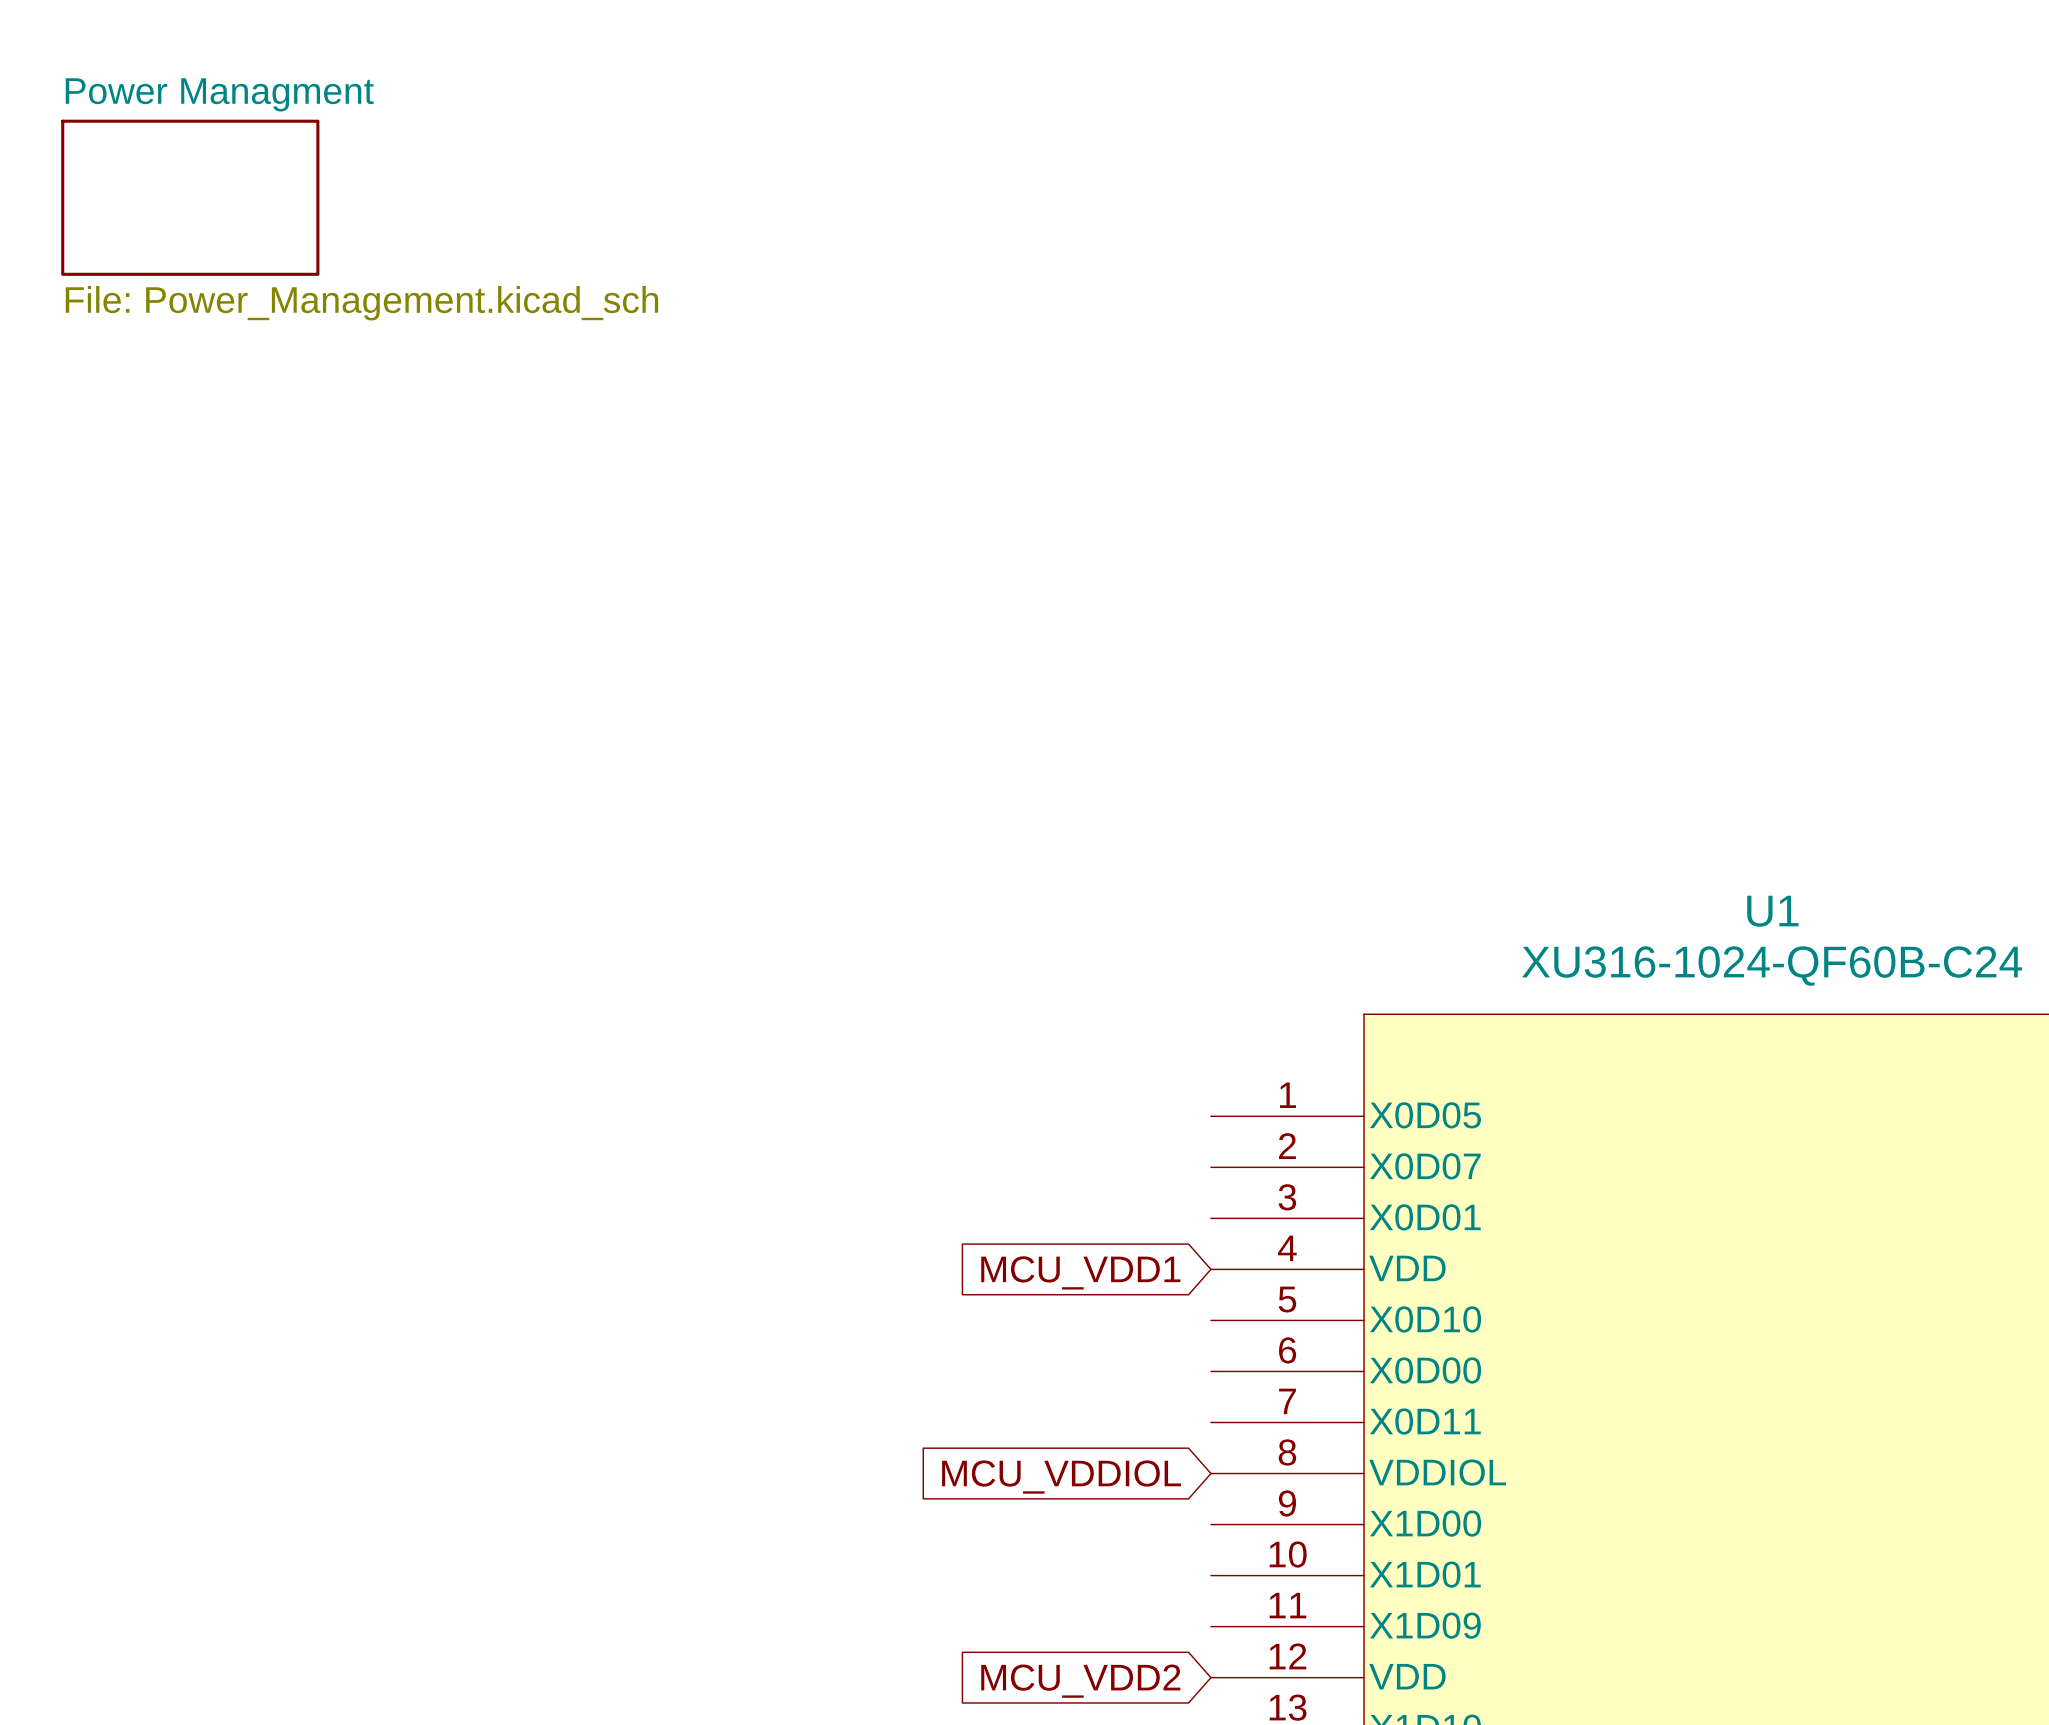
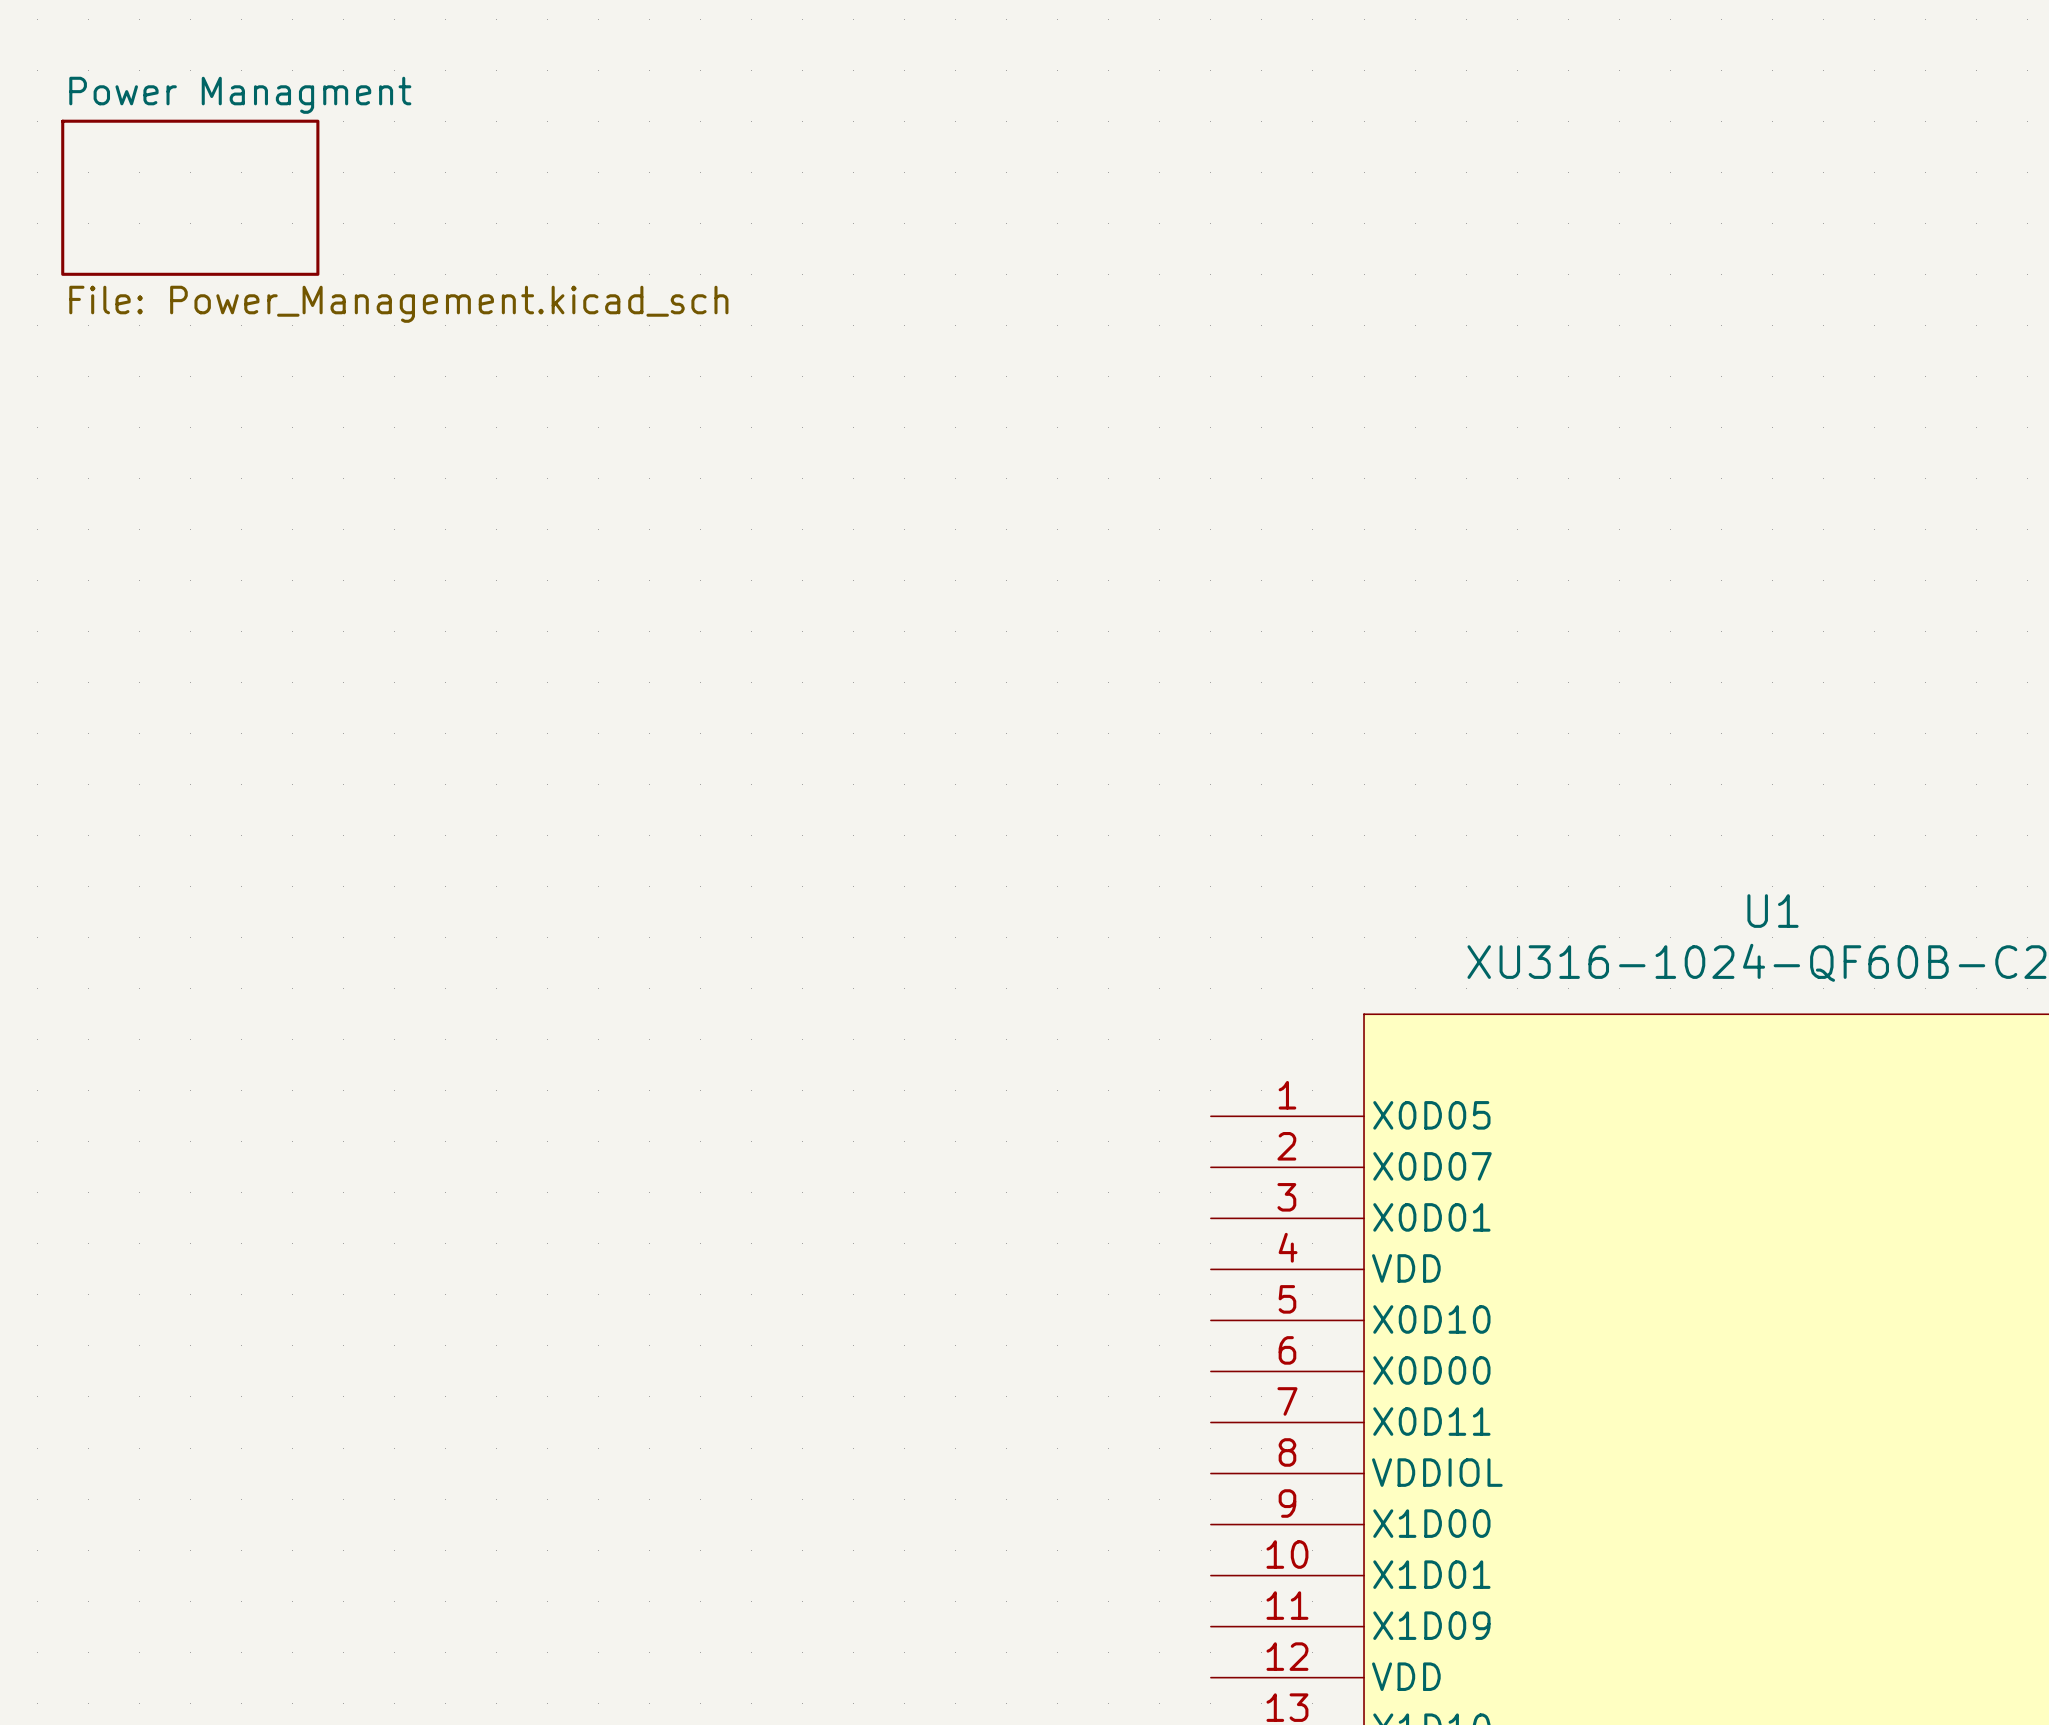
global label: MCU_VDD1 (1080, 1272) -> none
global label: MCU_VDDIOL (1061, 1477) -> none
global label: MCU_VDD2 (1080, 1681) -> none

